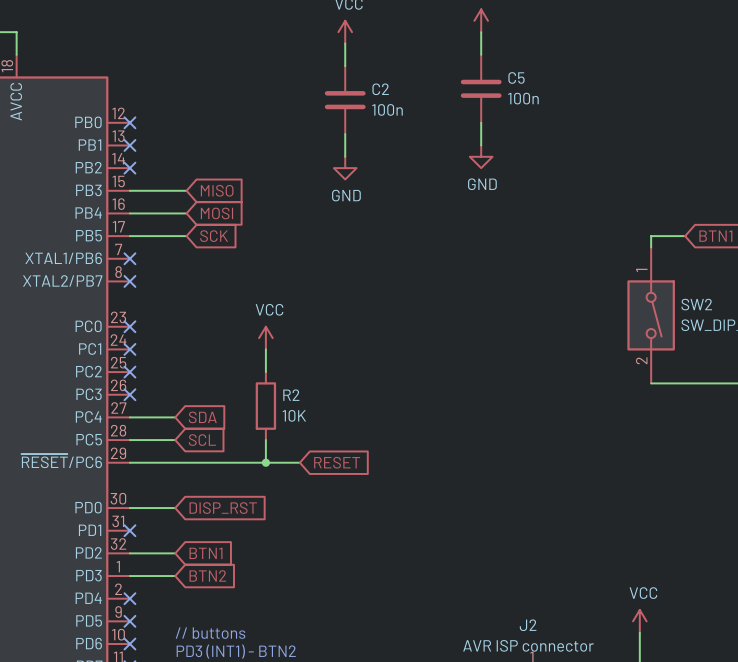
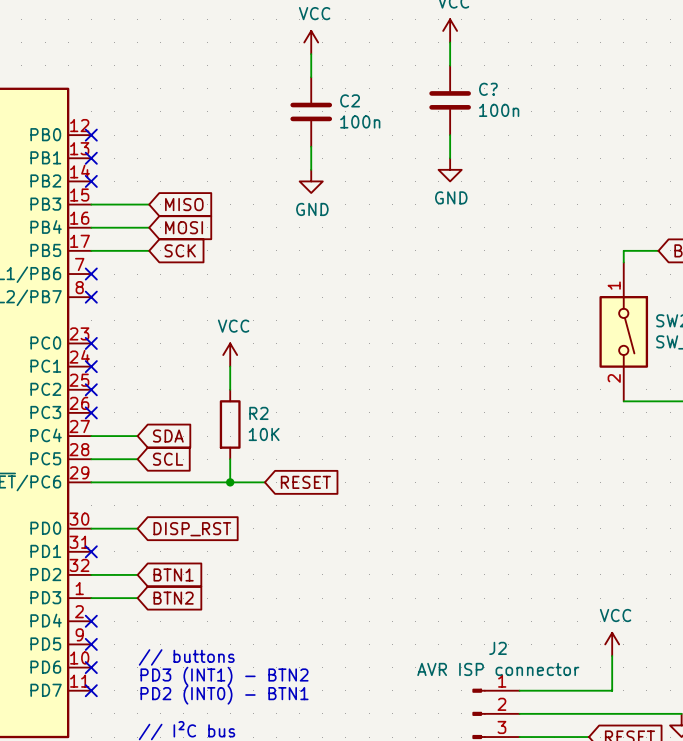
C5 name: C5 (516, 77) -> C? (488, 89)

